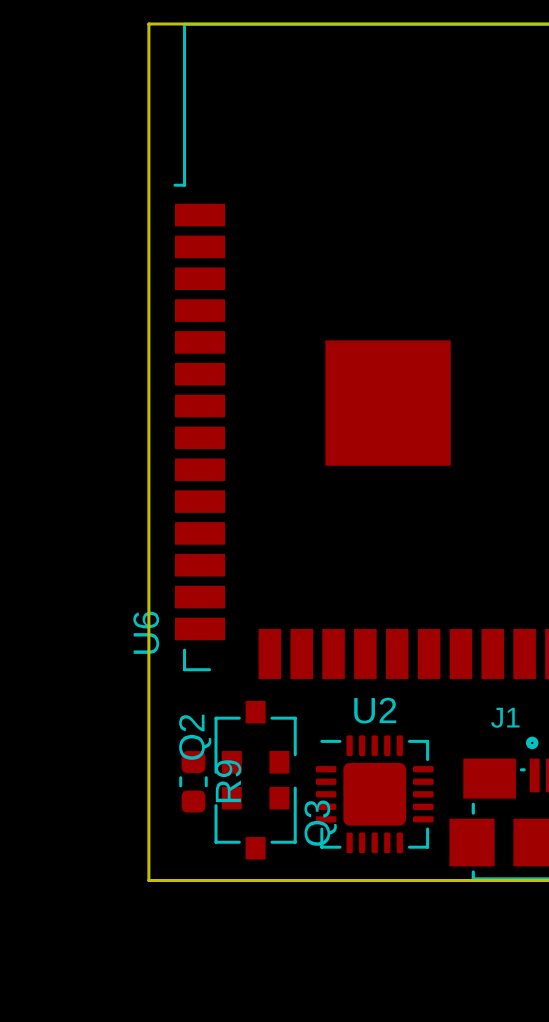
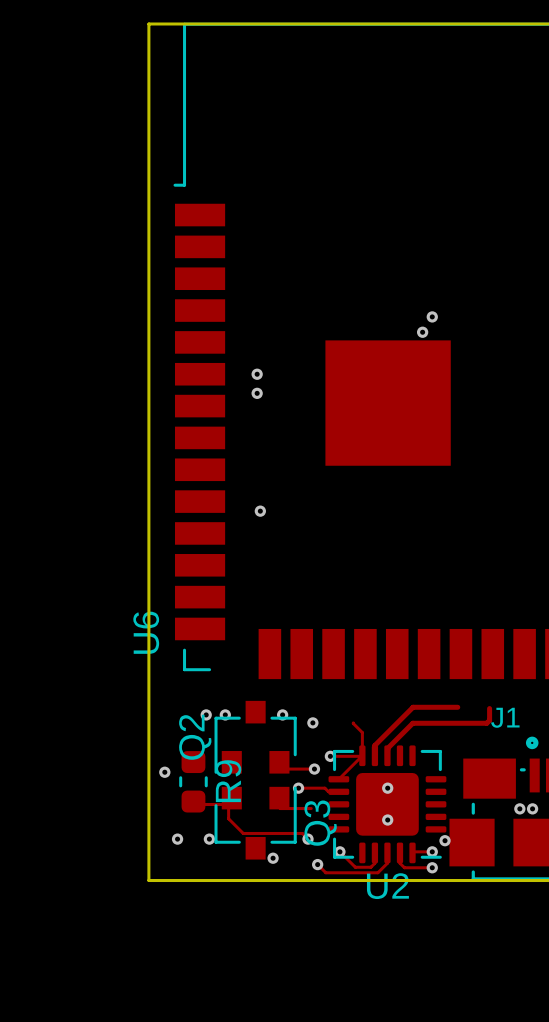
via: none -> (432, 316)
via: none -> (422, 332)
via: none -> (257, 374)
via: none -> (257, 393)
via: none -> (260, 511)
track: none -> (457, 707) (413, 707) (374, 745) (374, 755)
track: none -> (489, 708) (489, 720) (486, 723) (412, 723) (387, 749)
via: none -> (206, 714)
via: none -> (225, 714)
via: none -> (282, 714)
via: none -> (312, 722)
track: none -> (353, 722) (362, 732) (362, 755) (338, 779)
track: none -> (330, 756) (361, 756)
via: none -> (330, 756)
track: none -> (276, 768) (314, 769)
via: none -> (314, 769)
via: none -> (164, 772)
track: none -> (298, 788) (324, 788) (328, 791) (338, 791)
via: none -> (298, 788)
via: none -> (387, 788)
U2 rotation: 0° (374, 794) -> 180° (387, 804)
track: none -> (276, 804) (280, 808) (311, 808)
track: none -> (190, 807) (193, 804) (228, 804) (228, 818) (243, 833) (302, 833) (308, 839)
via: none -> (519, 808)
via: none -> (532, 808)
via: none -> (387, 820)
via: none -> (177, 839)
via: none -> (209, 839)
via: none -> (308, 839)
via: none -> (445, 840)
track: none -> (339, 851) (355, 867) (370, 867) (374, 863) (374, 852)
via: none -> (339, 851)
track: none -> (432, 851) (412, 852)
via: none -> (432, 851)
track: none -> (387, 852) (387, 863) (377, 872) (325, 872) (317, 864)
track: none -> (399, 852) (399, 863) (404, 867) (432, 867)
via: none -> (273, 858)
via: none -> (317, 864)
via: none -> (432, 867)

